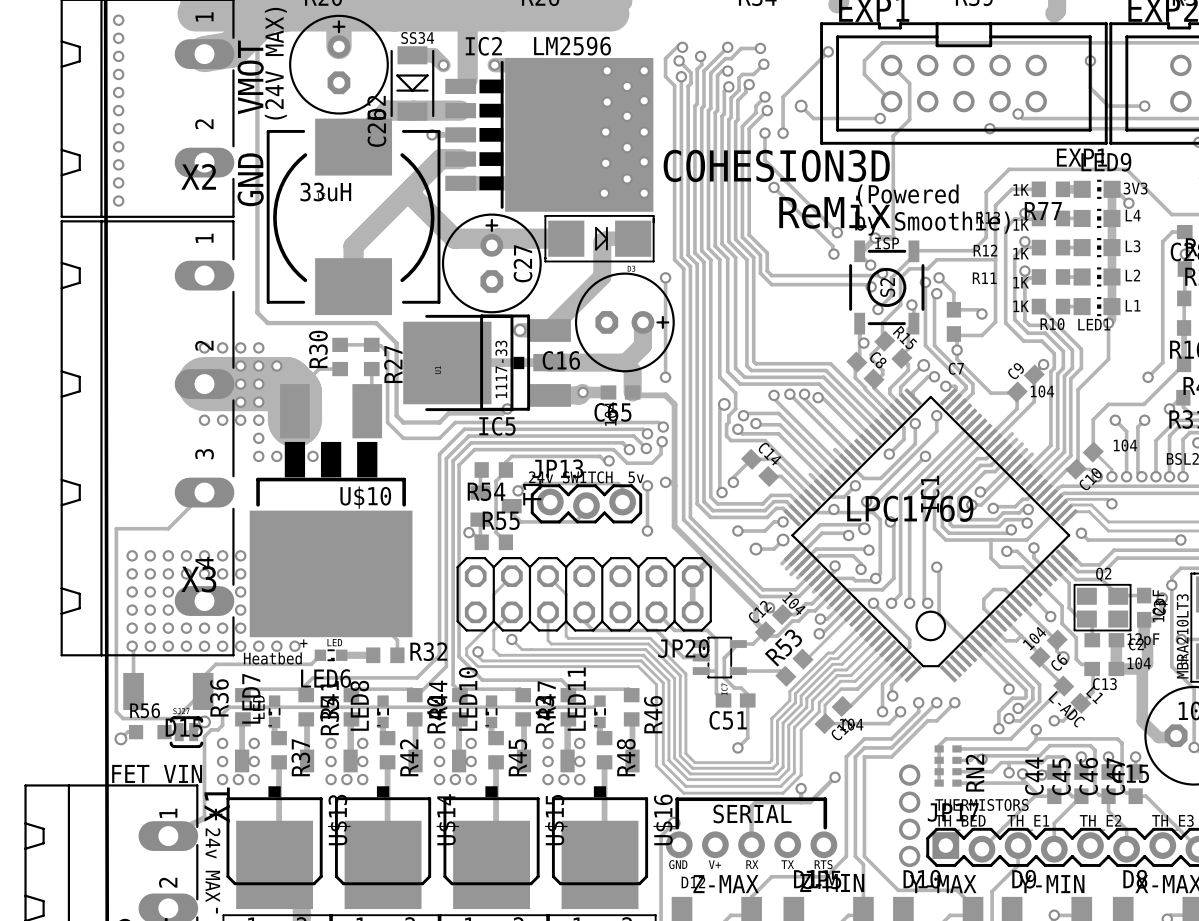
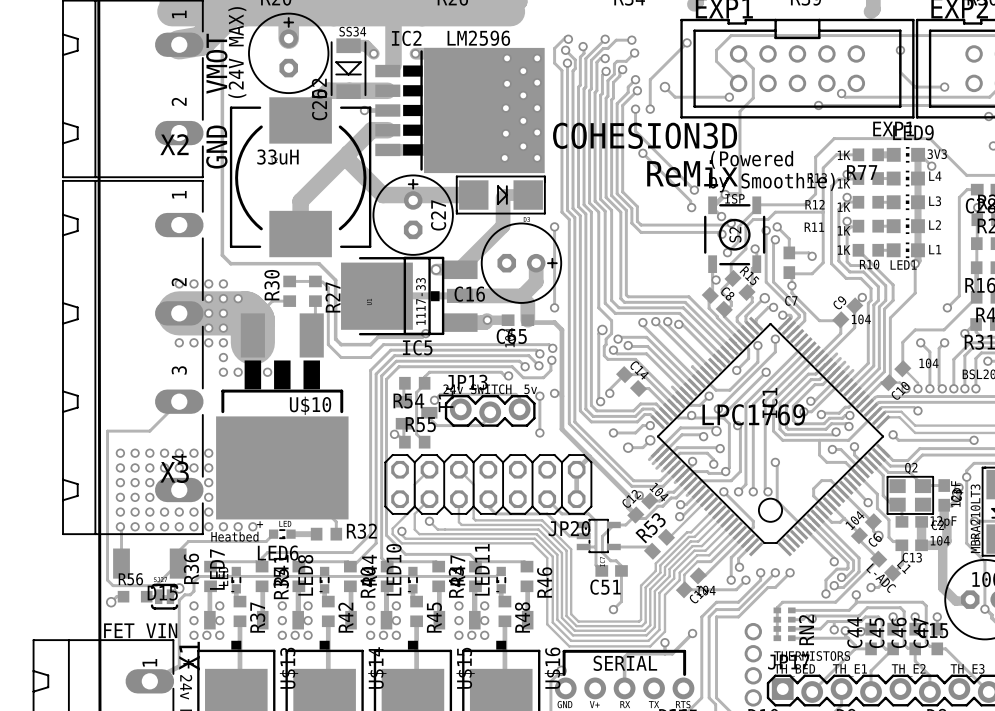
via: (118, 20) -> none
via: (118, 38) -> none
via: (118, 56) -> none
via: (118, 74) -> none
via: (118, 92) -> none
via: (118, 110) -> none
via: (118, 128) -> none
via: (118, 146) -> none
via: (118, 164) -> none
via: (118, 182) -> none
via: (118, 201) -> none

